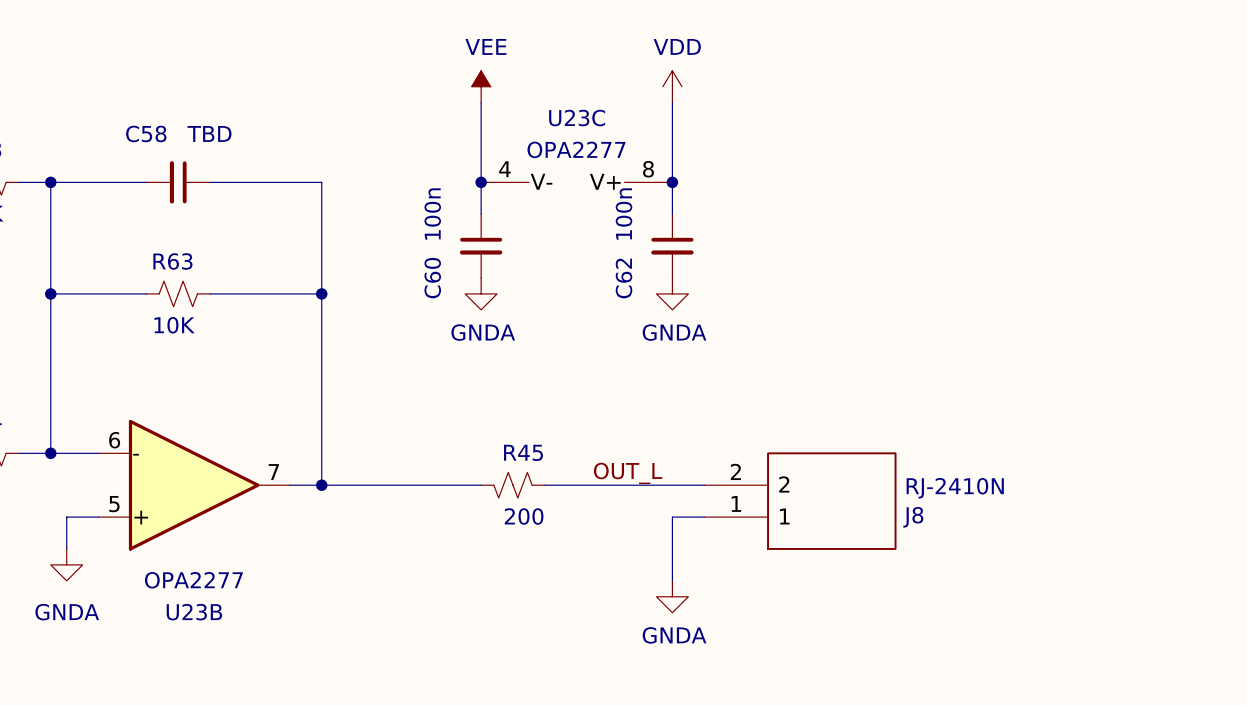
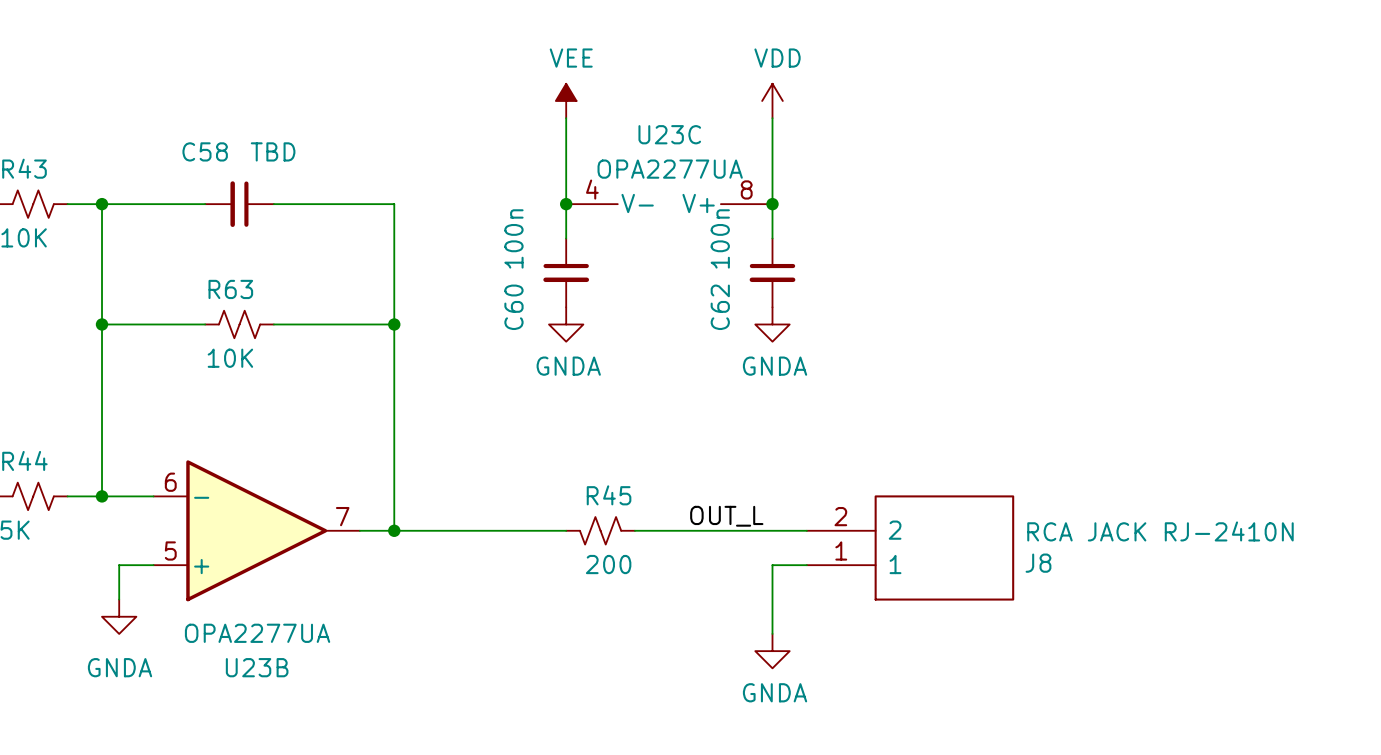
U23C value: OPA2277 (576, 149) -> OPA2277UA (670, 169)
J8 value: RJ-2410N (955, 488) -> RCA JACK RJ-2410N (1160, 531)
U23B value: OPA2277 (193, 580) -> OPA2277UA (257, 633)

